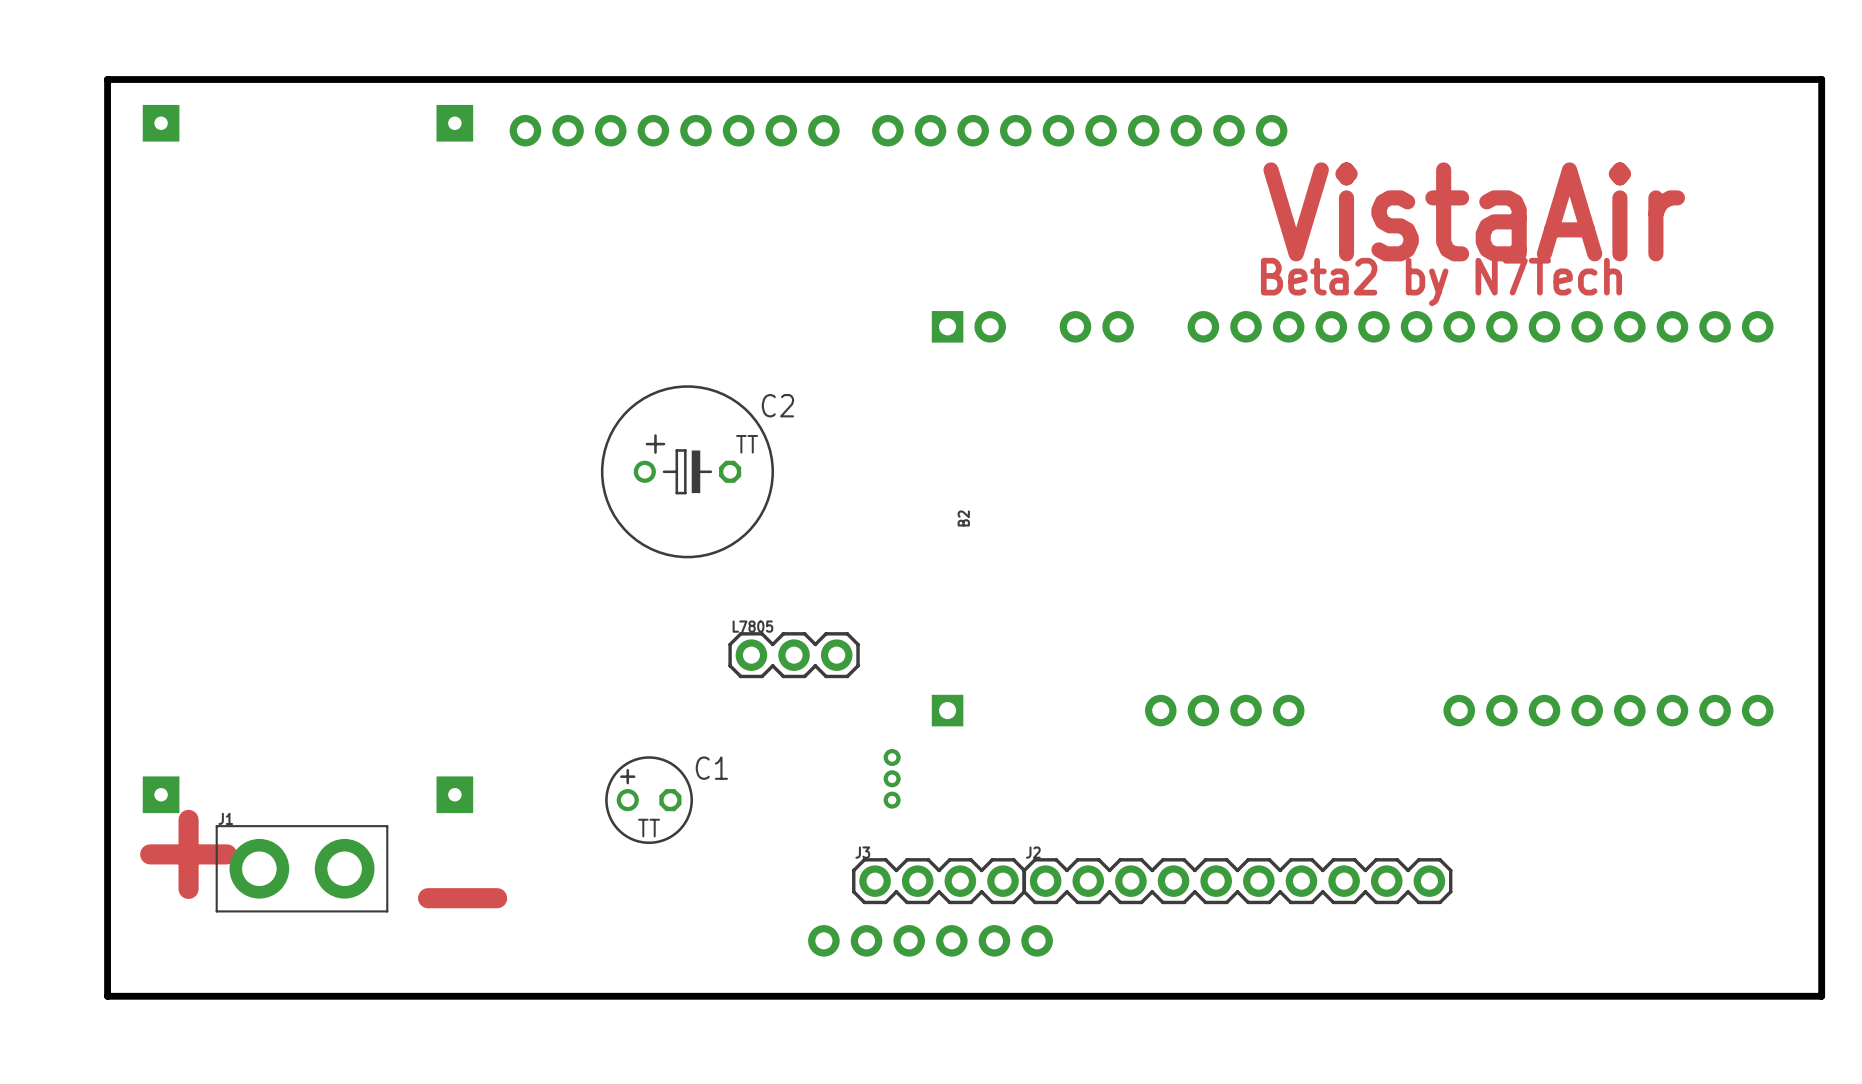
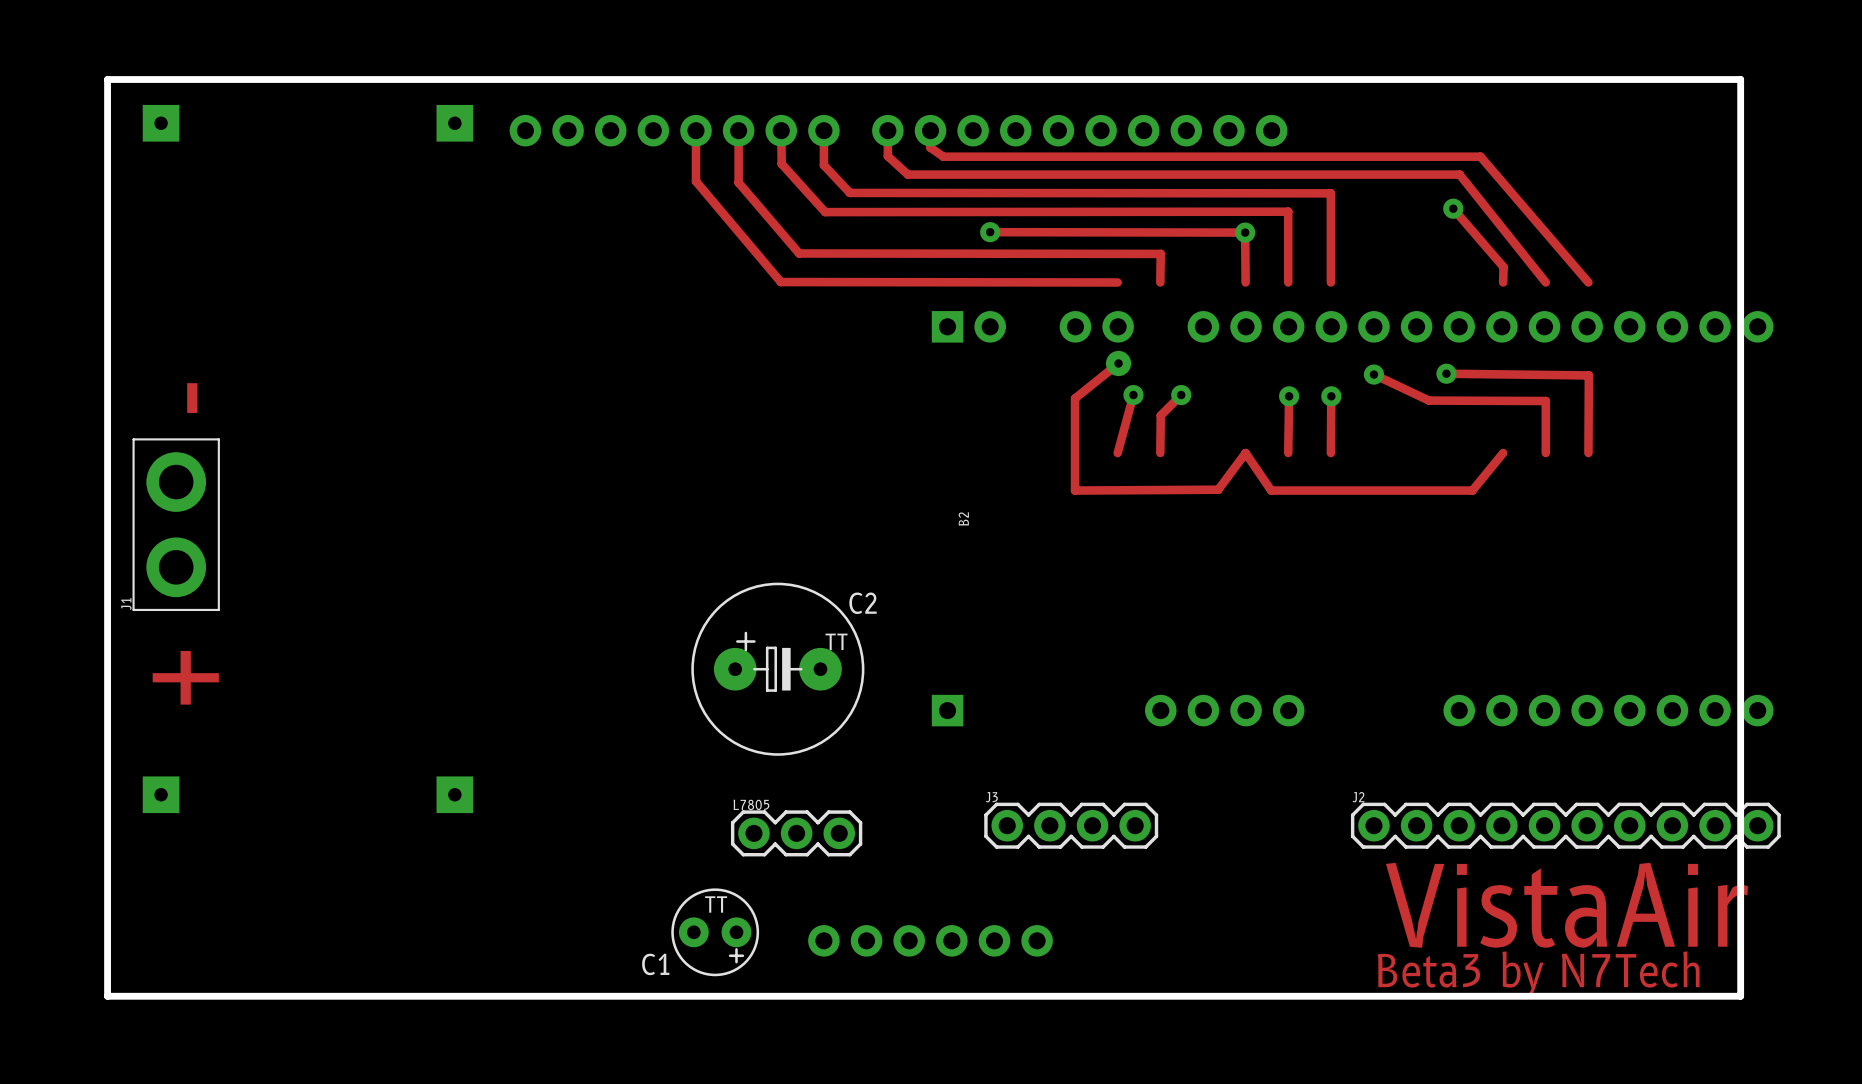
board edge: (1740, 79) (1821, 79) (1821, 996) (1740, 996) -> (1740, 79) (1740, 996)
track: none -> (695, 130) (695, 181) (780, 282) (1117, 282)
track: none -> (738, 130) (738, 182) (799, 253) (1160, 253) (1160, 282)
track: none -> (781, 130) (781, 163) (825, 212) (1288, 211) (1288, 282)
track: none -> (823, 130) (823, 165) (849, 192) (1330, 193) (1330, 282)
track: none -> (887, 130) (887, 156) (907, 174) (1459, 174) (1545, 282)
track: none -> (930, 130) (930, 147) (943, 156) (1480, 156) (1588, 282)
track: none -> (1453, 208) (1503, 267) (1503, 282)
via: none -> (1453, 208)
text: VistaAir (1474, 211) -> none
track: none -> (990, 232) (1245, 232) (1245, 282)
via: none -> (990, 232)
via: none -> (1245, 232)
text: Beta2 by N7Tech (1441, 281) -> none
text: none -> - (192, 398)
track: none -> (1118, 363) (1075, 398) (1075, 490) (1218, 489) (1245, 453) (1271, 490) (1472, 490) (1503, 453)
via: none -> (1118, 363)
track: none -> (1446, 373) (1588, 375) (1588, 453)
via: none -> (1446, 373)
track: none -> (1373, 374) (1428, 400) (1545, 401) (1545, 453)
via: none -> (1373, 374)
C2 footprint: [600, 385, 775, 559] -> [691, 582, 865, 756]
track: none -> (1133, 395) (1117, 453)
via: none -> (1133, 395)
track: none -> (1181, 395) (1160, 415) (1160, 453)
via: none -> (1181, 395)
track: none -> (1289, 396) (1288, 453)
via: none -> (1289, 396)
track: none -> (1331, 396) (1330, 453)
via: none -> (1331, 396)
L7805 position: (794, 655) -> (796, 833)
C1 footprint: [605, 756, 694, 845] -> [671, 888, 760, 977]
C1 name position: C1 (711, 768) -> C1 (655, 964)
part: (892, 778) -> none
J1 name position: J1 (225, 818) -> J1 (126, 604)
text position: + (188, 854) -> + (185, 677)
J1 rotation: 0° (301, 868) -> 90° clockwise (176, 524)
J1 position: (301, 868) -> (176, 524)
J3 position: (939, 881) -> (1071, 825)
J2 position: (1237, 881) -> (1565, 825)
text: - (462, 898) -> none
text: none -> VistaAir (1566, 905)
text: none -> Beta3 by N7Tech (1538, 974)

